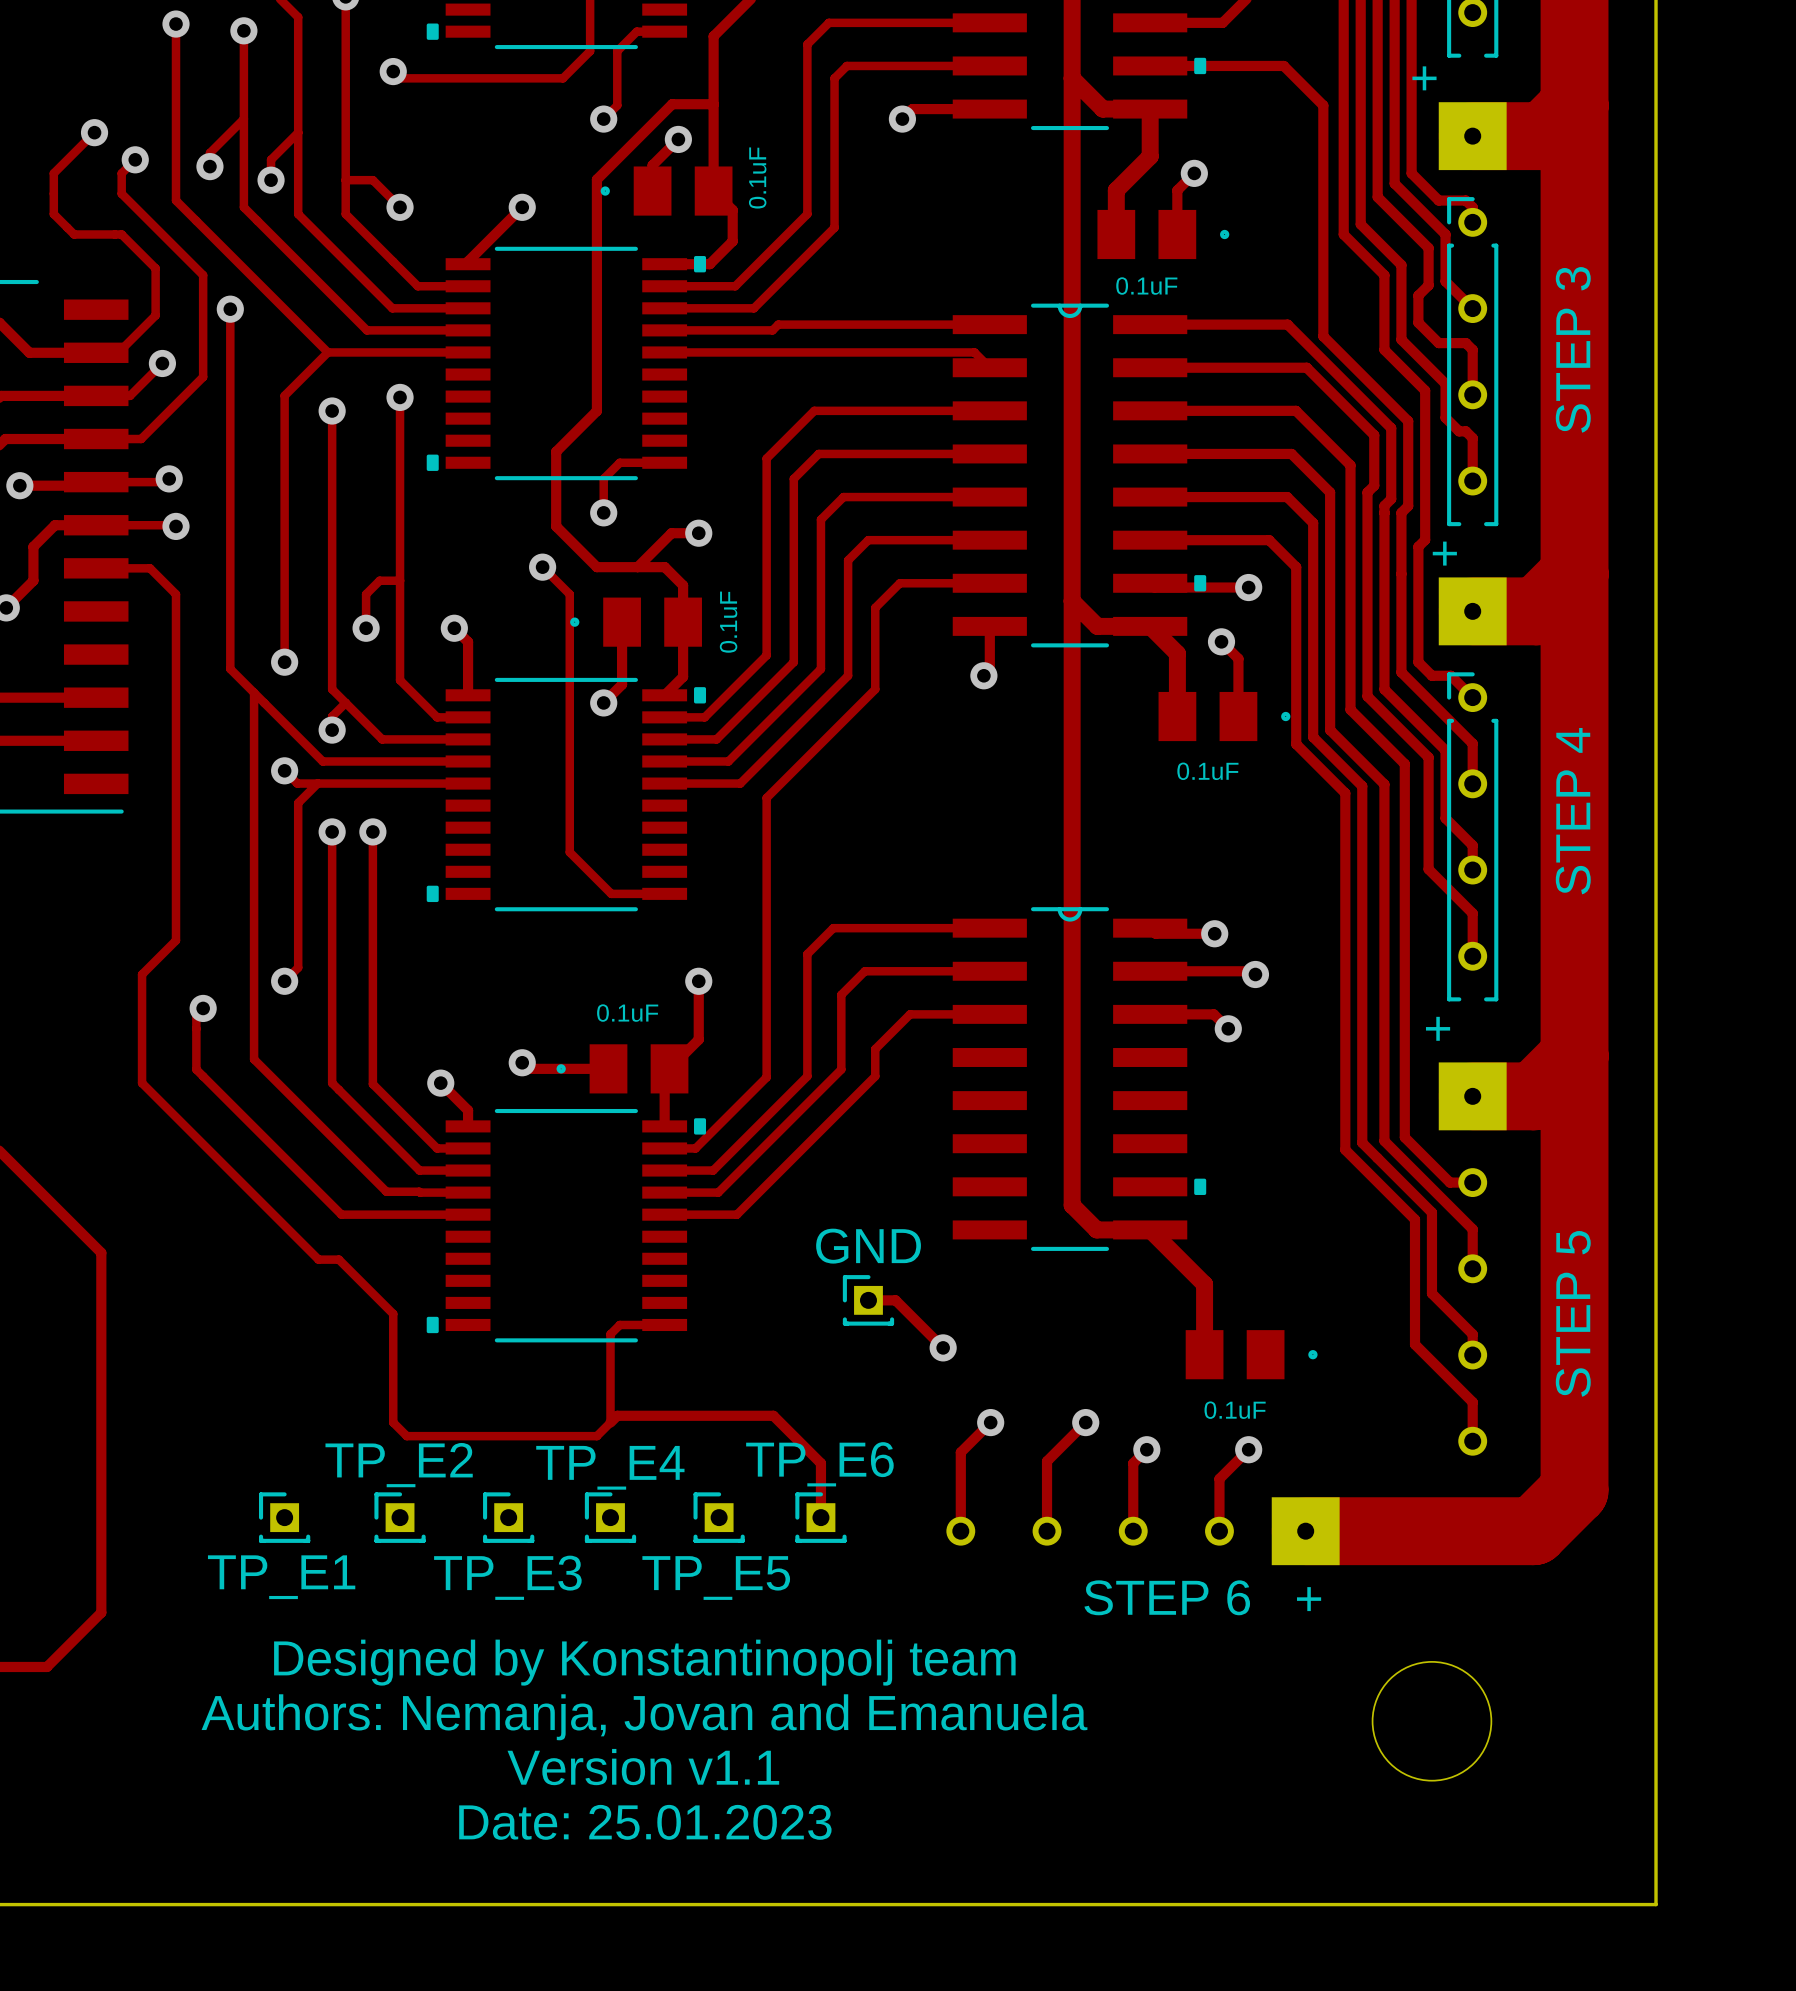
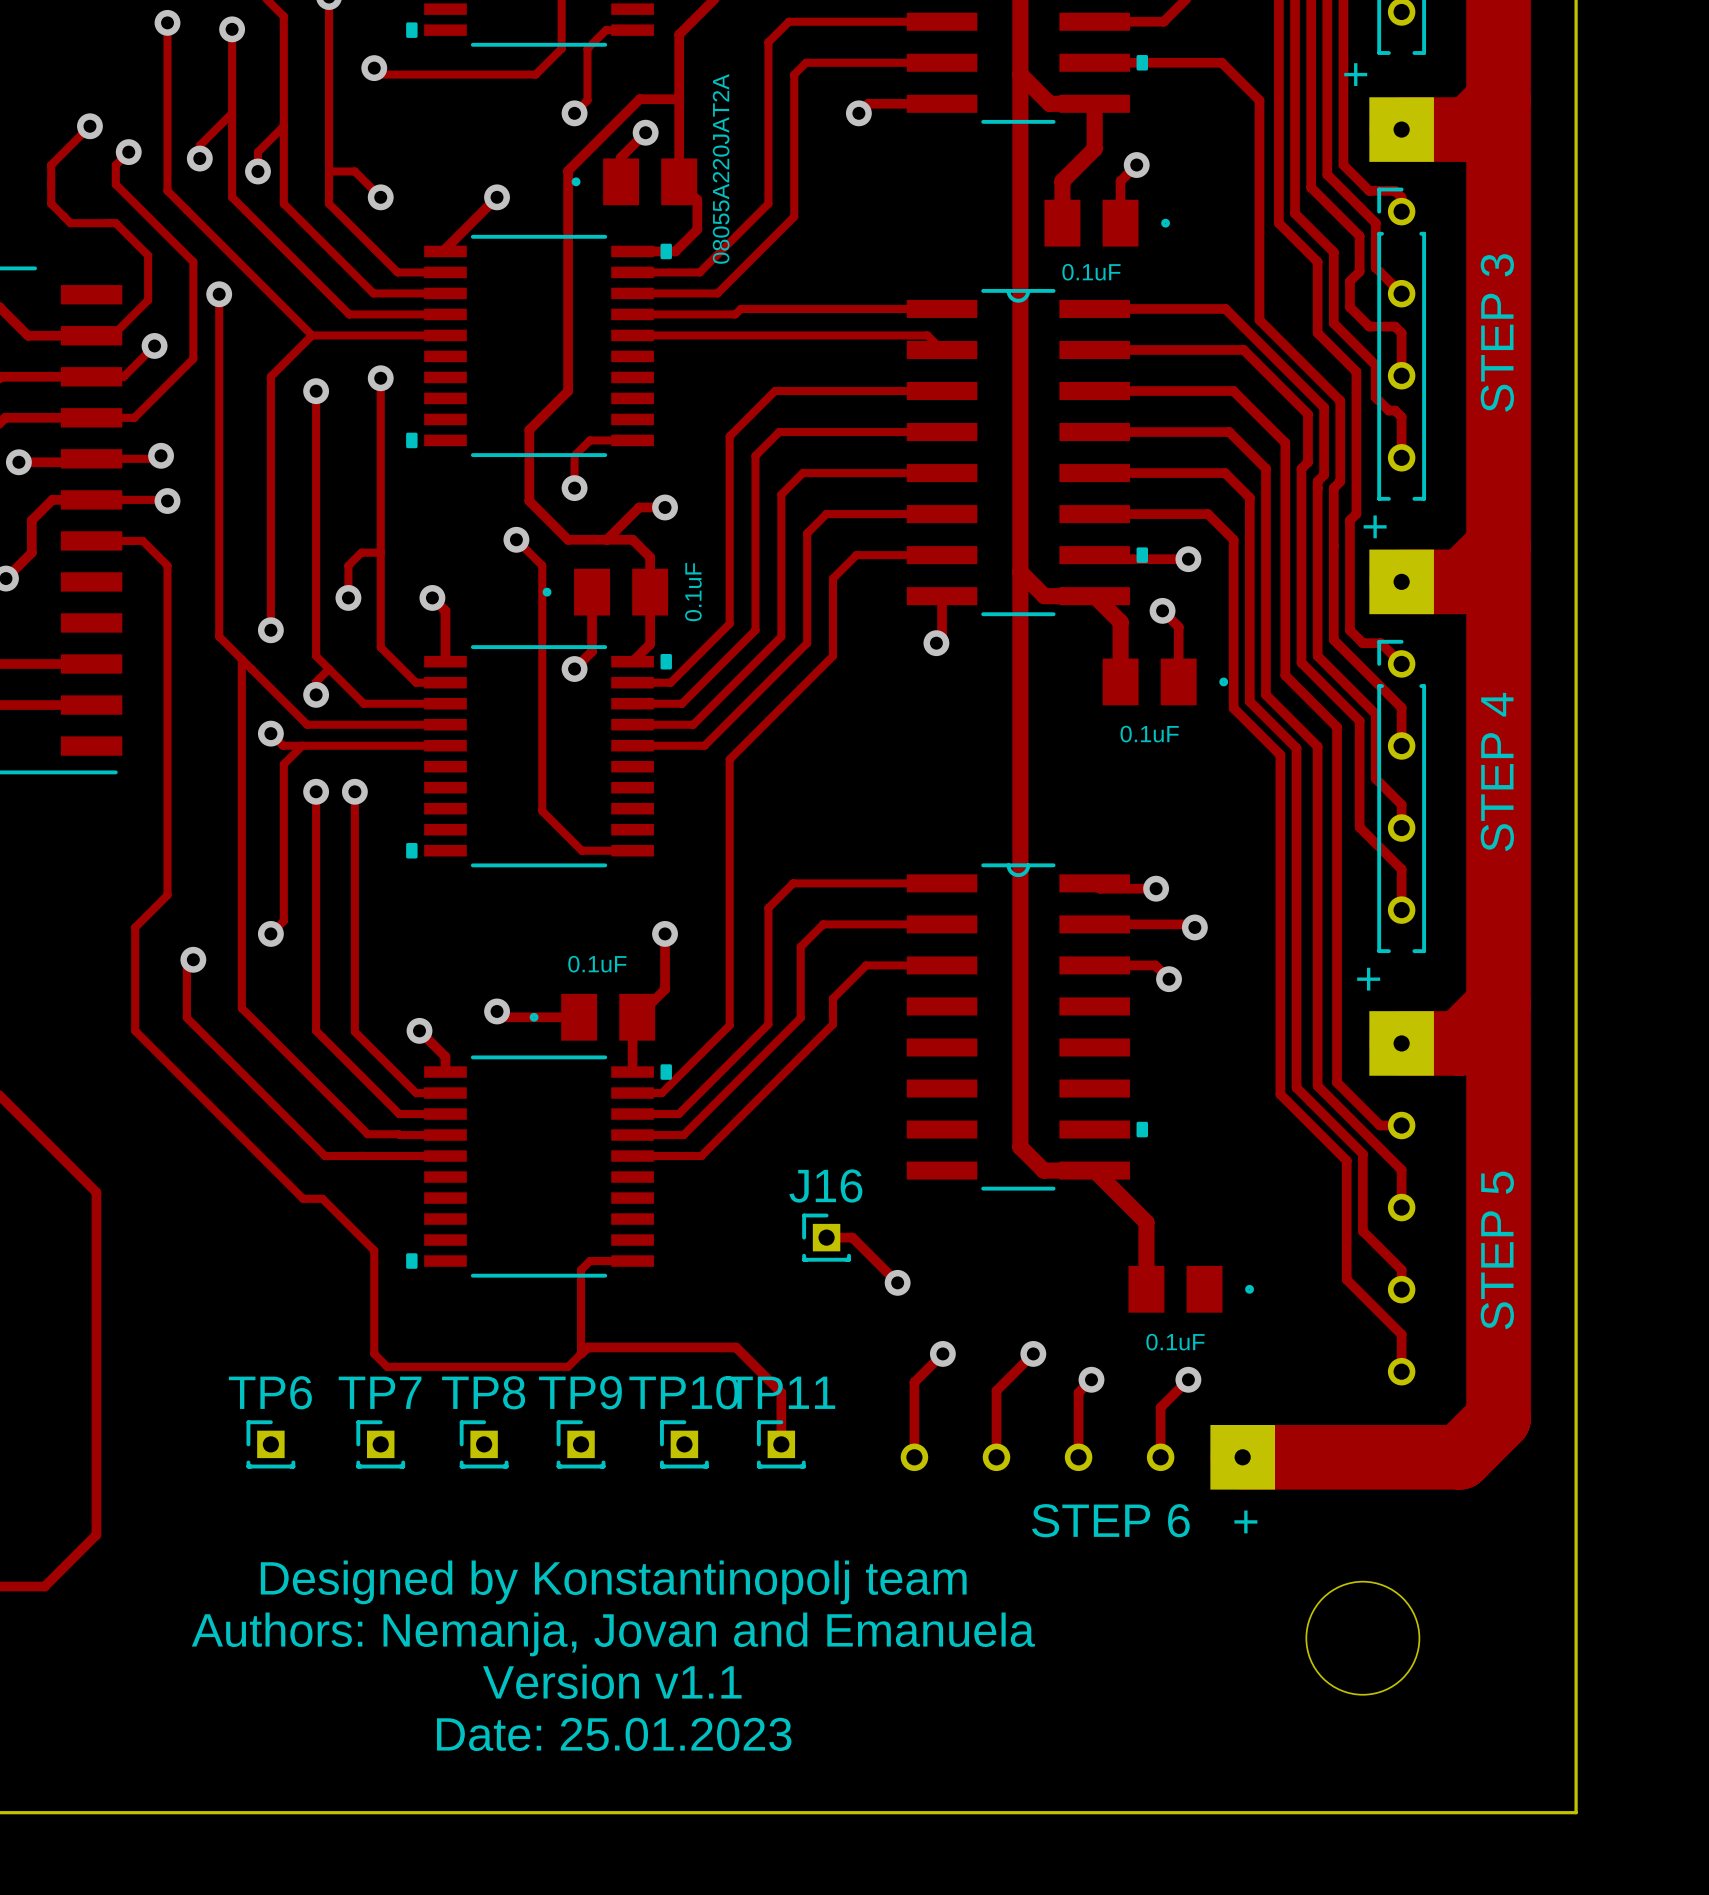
part value: 0.1uF (757, 177) -> 08055A220JAT2A (721, 168)
GND name: GND (868, 1246) -> J16 (825, 1186)
TP_E6 name: TP_E6 (819, 1464) -> TP11 (780, 1392)
TP_E2 name: TP_E2 (399, 1465) -> TP7 (380, 1392)
TP_E4 name: TP_E4 (610, 1467) -> TP9 (580, 1392)
TP_E1 name: TP_E1 (281, 1577) -> TP6 (270, 1392)
TP_E3 name: TP_E3 (507, 1577) -> TP8 (483, 1392)
TP_E5 name: TP_E5 (716, 1578) -> TP10 (684, 1392)

